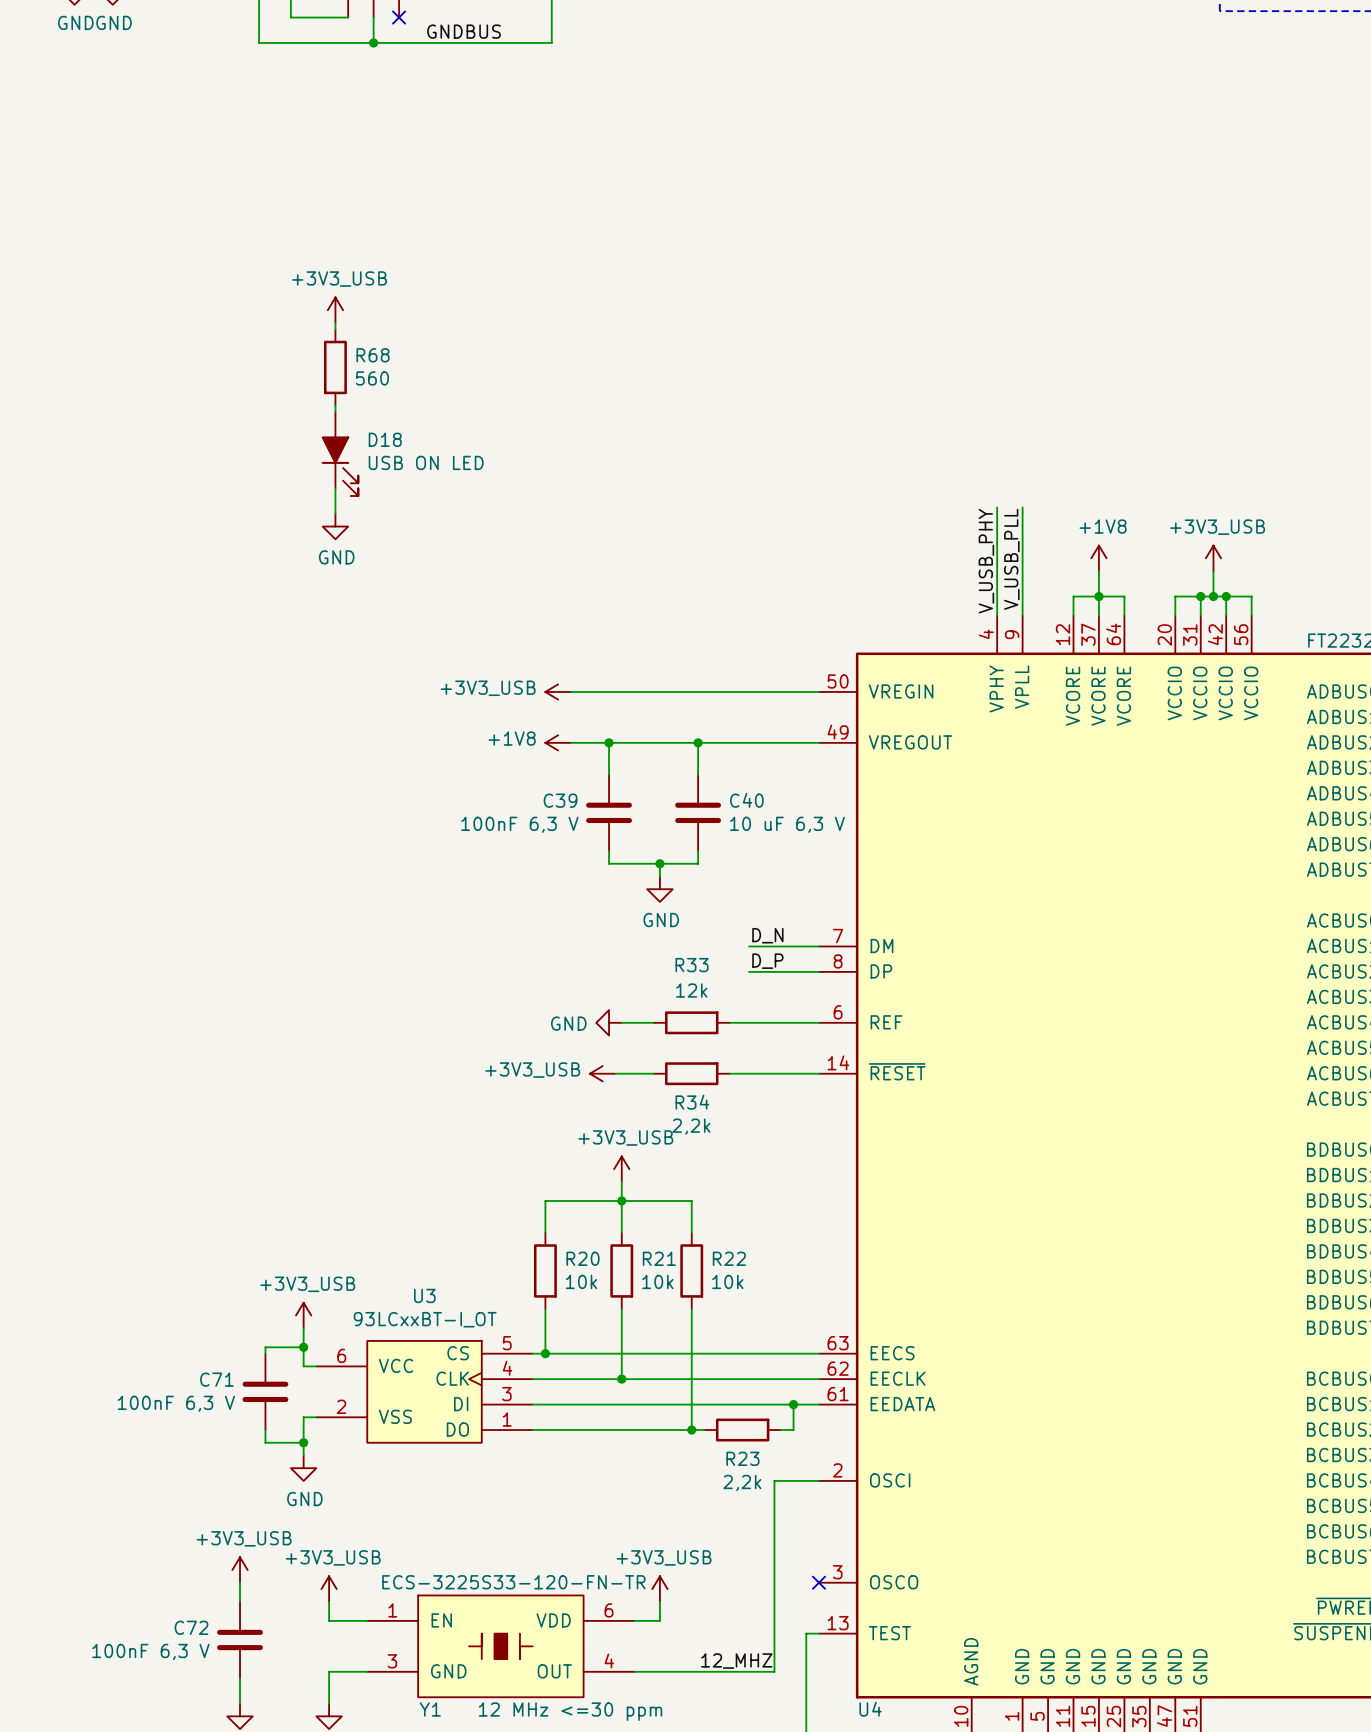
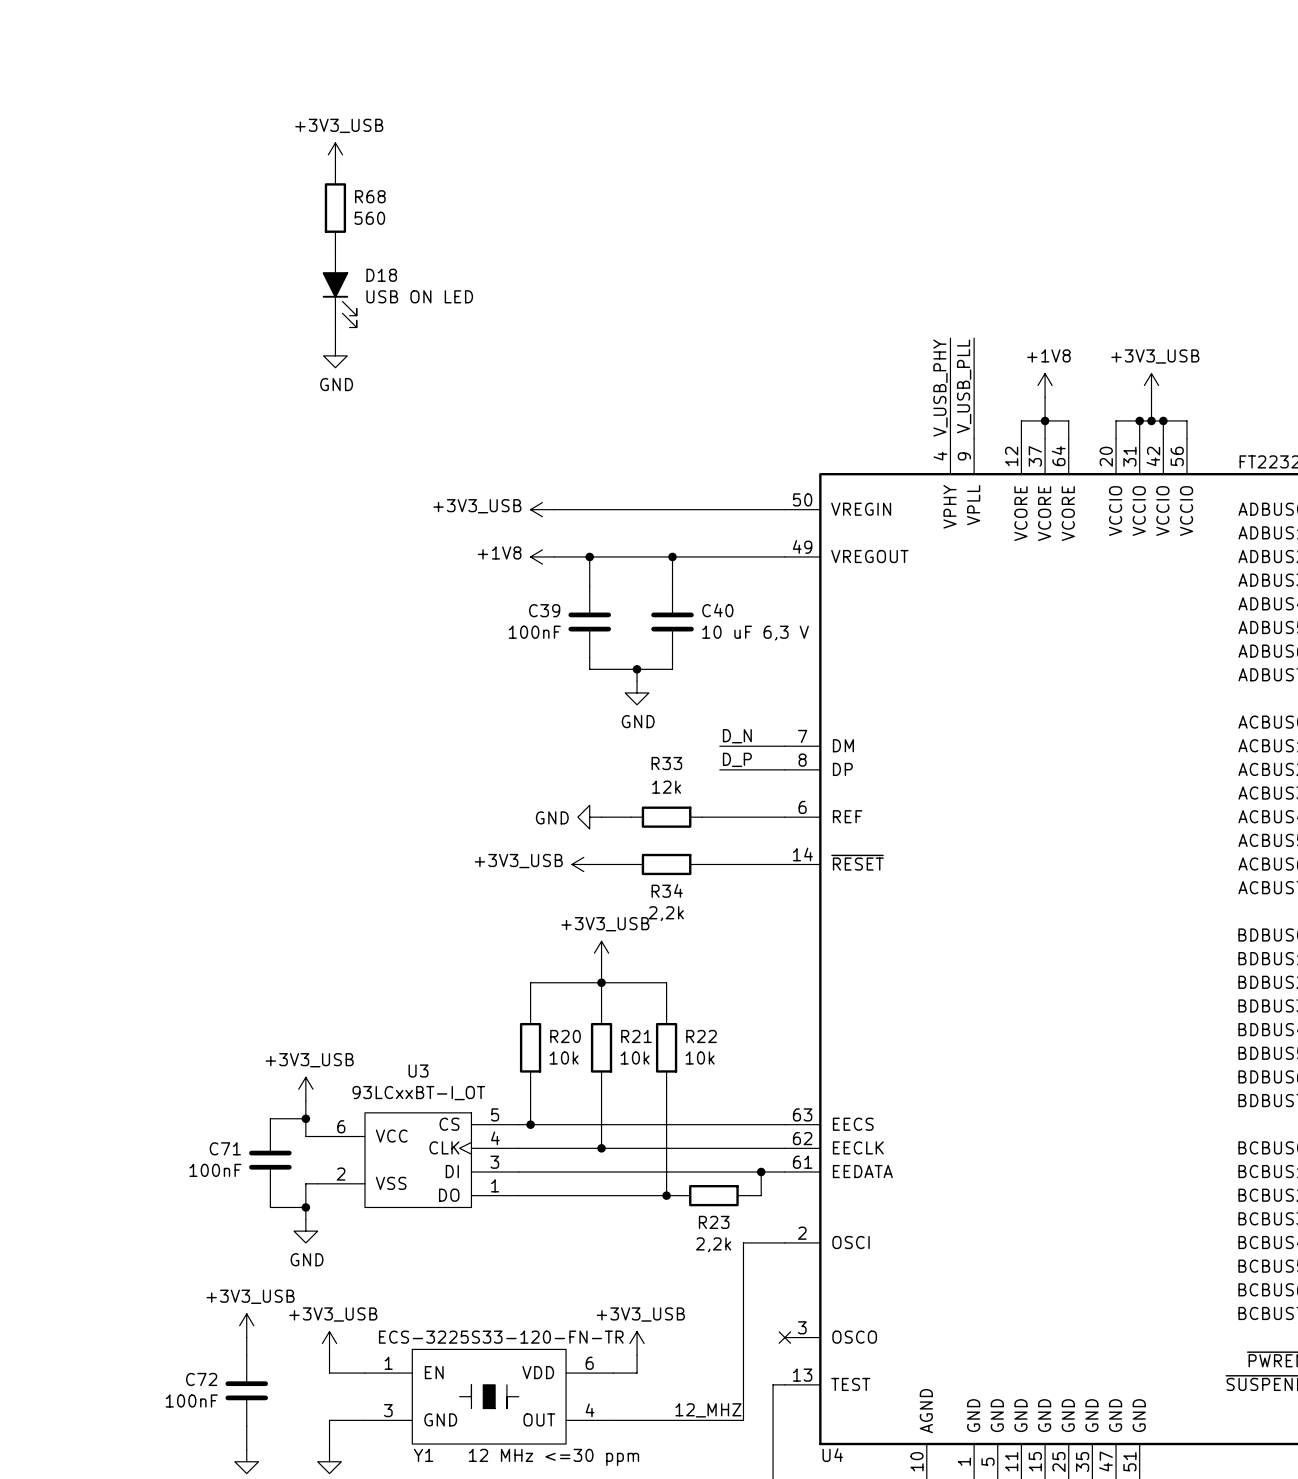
C39 value: 100nF 6,3 V (519, 824) -> 100nF (534, 632)
C71 value: 100nF 6,3 V (176, 1403) -> 100nF (215, 1170)
C72 value: 100nF 6,3 V (150, 1651) -> 100nF (191, 1400)

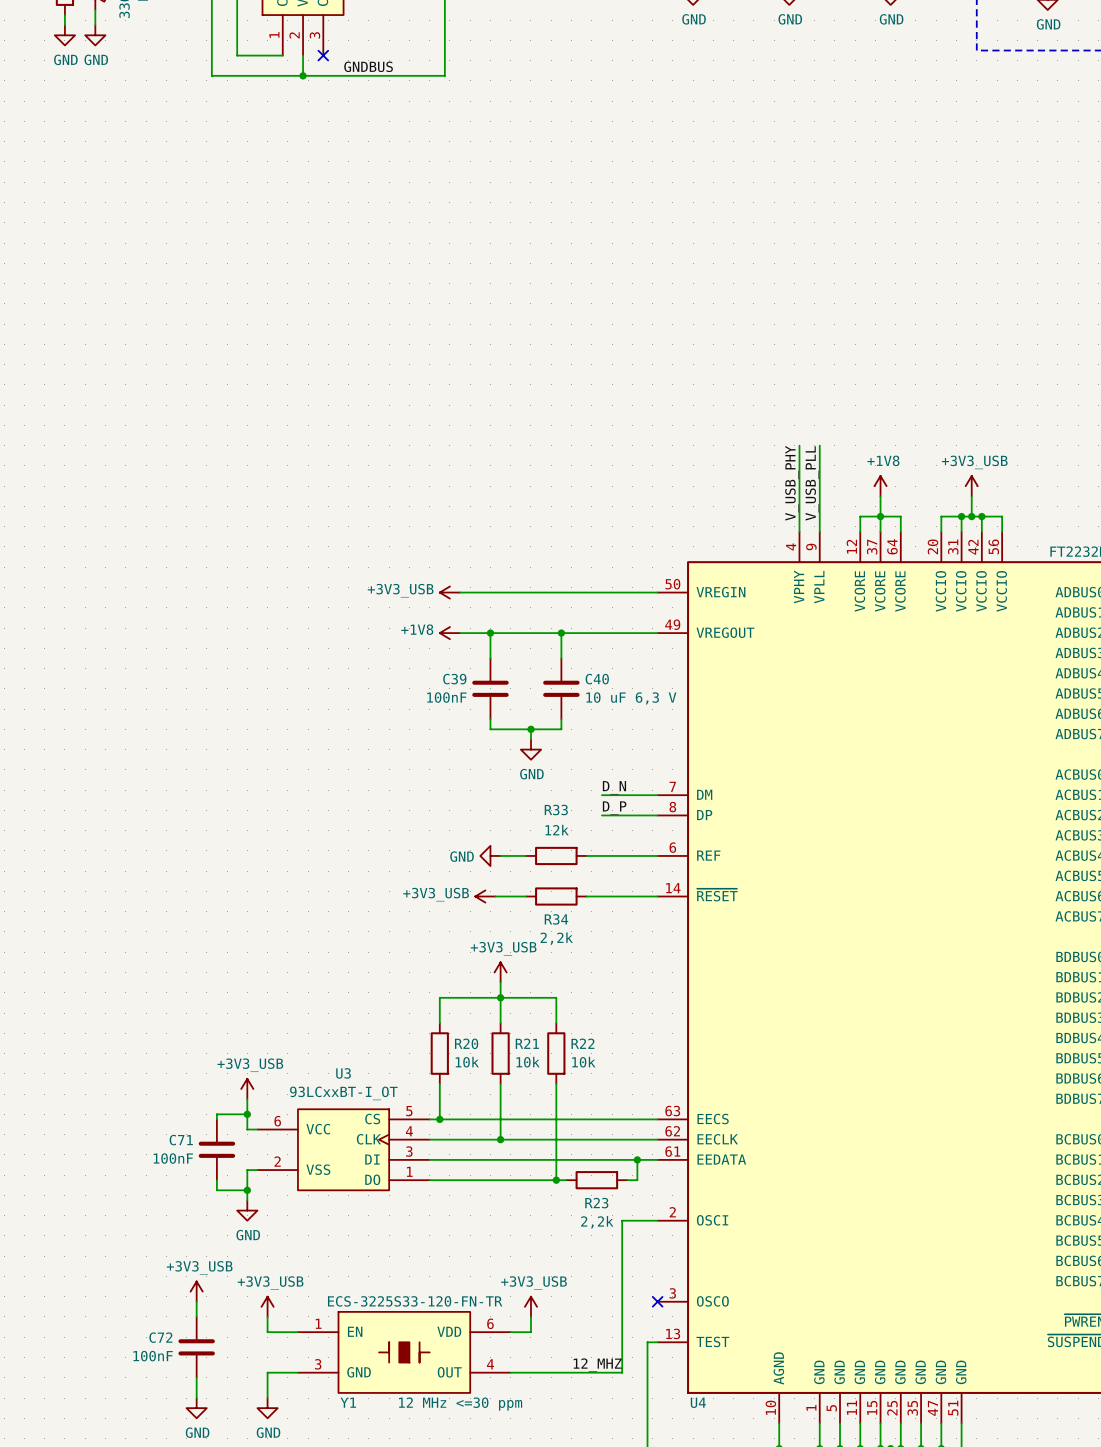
power symbol: +3V3_USB (335, 154) -> none
wire: (335, 166) (335, 172) -> none
R68: 560 (335, 208) -> none
wire: (335, 243) (335, 249) -> none
D18: USB ON LED (339, 288) -> none
wire: (335, 320) (335, 344) -> none
power symbol: GND (335, 355) -> none

